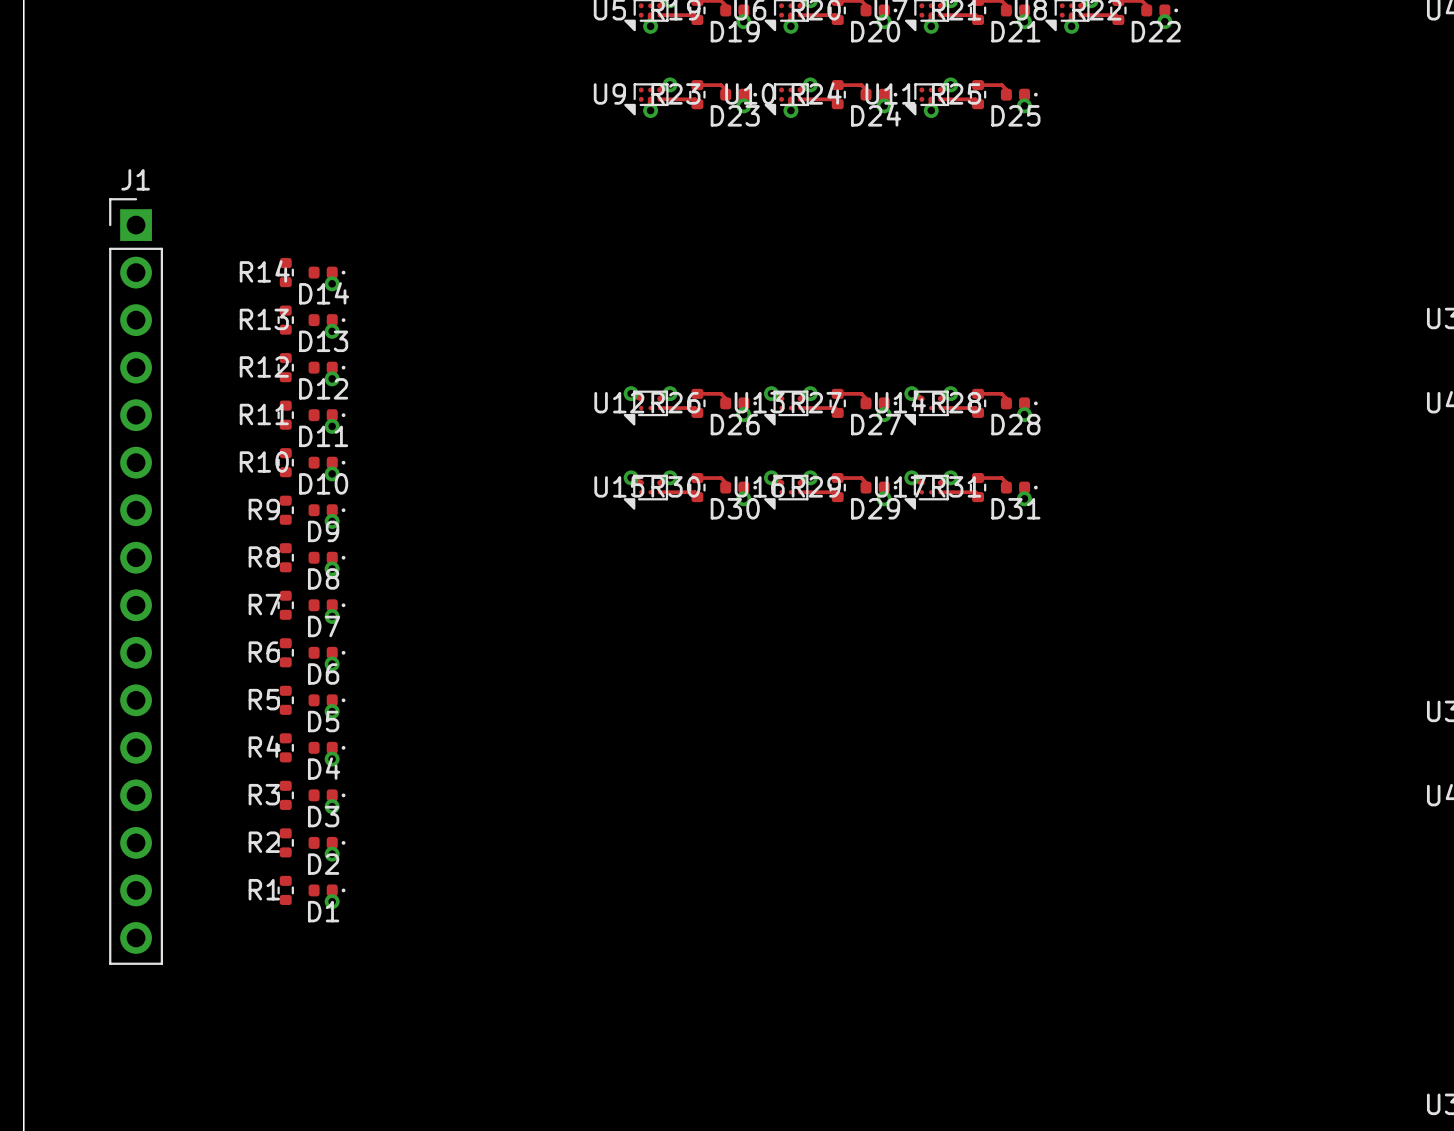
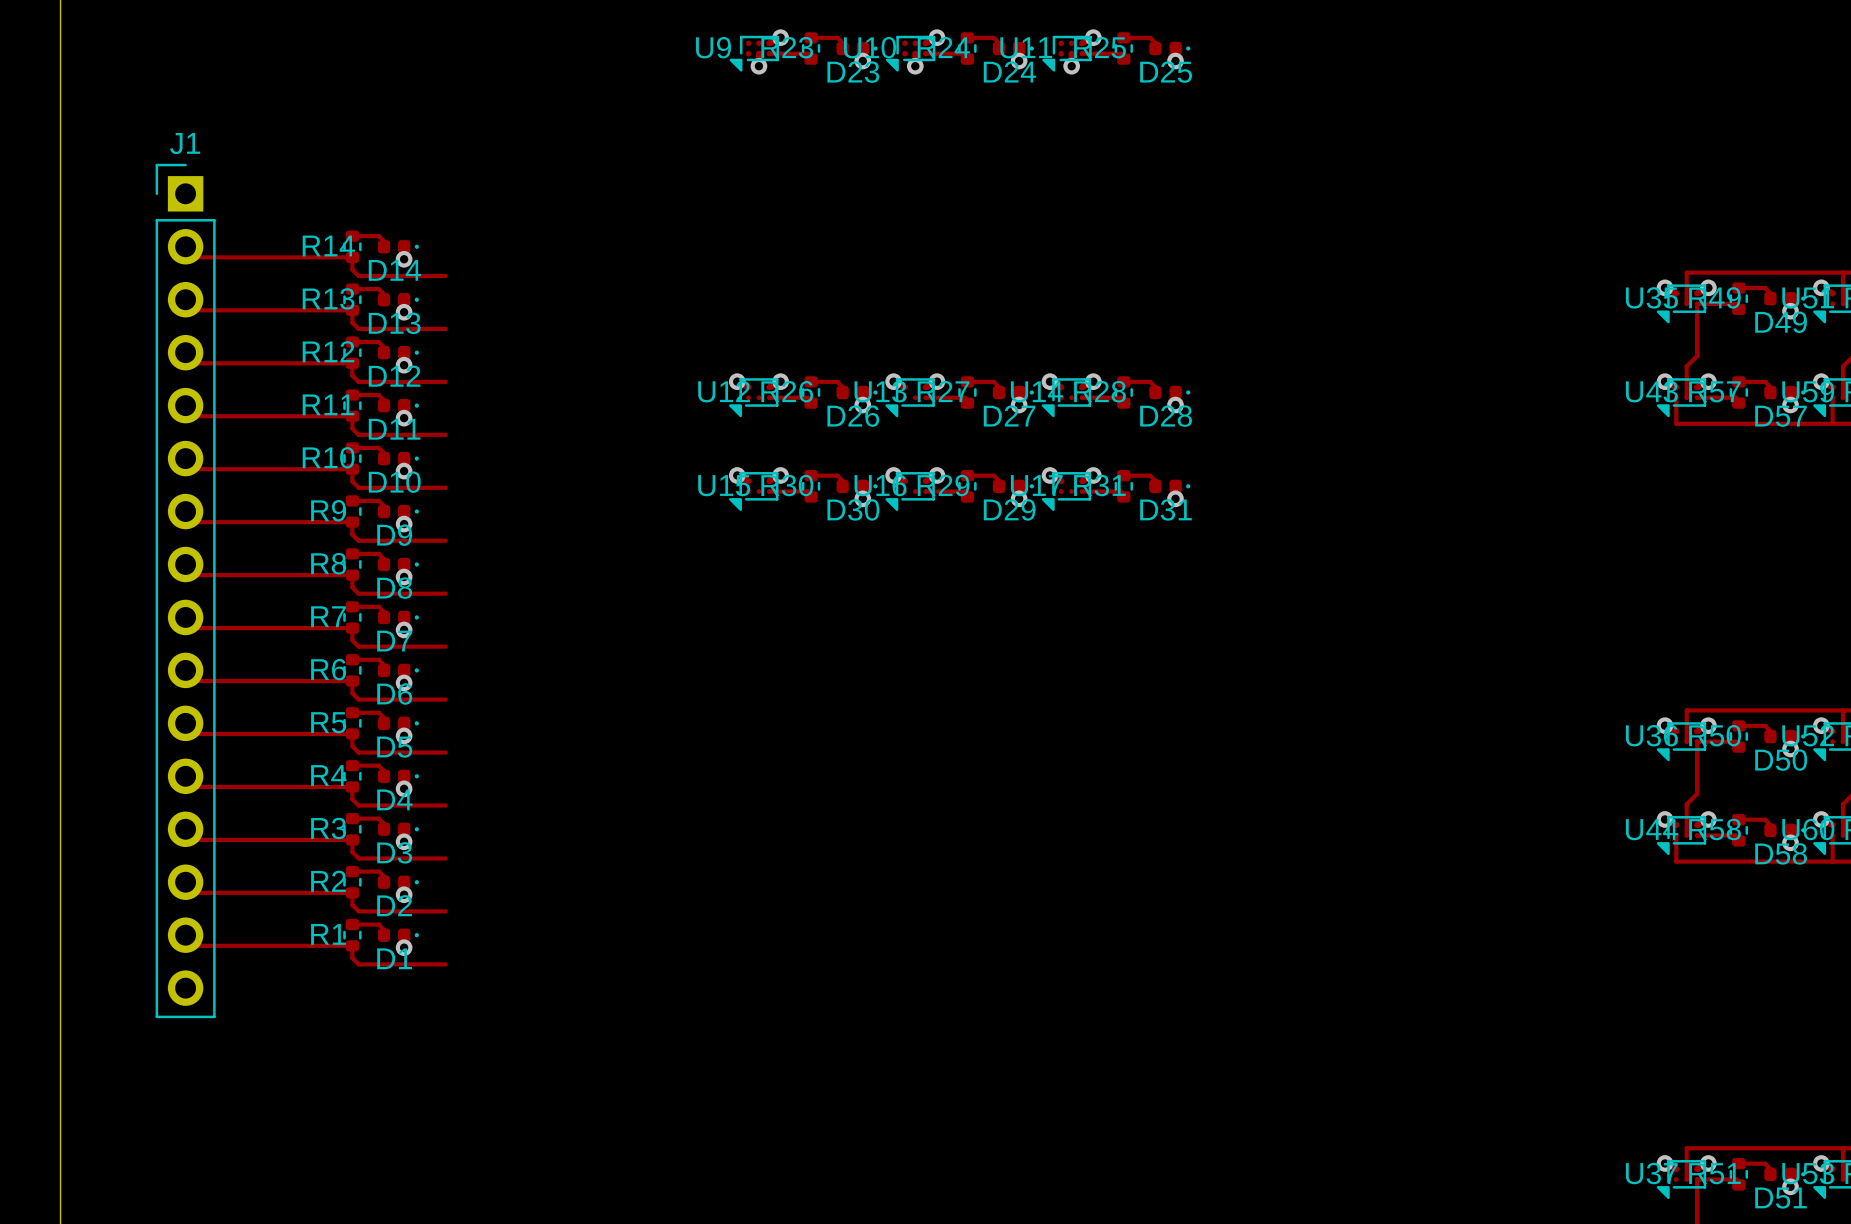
top track: none -> (352, 236) (378, 236) (384, 241) (384, 246)
top track: none -> (185, 246) (185, 252) (191, 257) (352, 257) (352, 269) (358, 275) (445, 275)
top track: none -> (352, 289) (378, 289) (384, 294) (384, 299)
top track: none -> (185, 299) (185, 304) (191, 310) (352, 310) (352, 322) (358, 328) (445, 328)
top track: none -> (352, 342) (378, 342) (384, 347) (384, 352)
top track: none -> (185, 352) (185, 357) (190, 363) (352, 363) (352, 375) (358, 381) (445, 381)
top track: none -> (352, 395) (378, 395) (384, 400) (384, 405)
top track: none -> (185, 405) (185, 411) (190, 416) (352, 416) (352, 428) (358, 434) (445, 434)
top track: none -> (352, 447) (378, 447) (384, 453) (384, 458)
top track: none -> (185, 458) (185, 463) (190, 469) (352, 469) (352, 481) (358, 487) (445, 487)
top track: none -> (352, 500) (378, 500) (384, 506) (384, 511)
top track: none -> (185, 511) (185, 516) (190, 522) (352, 522) (352, 534) (358, 540) (445, 540)
top track: none -> (352, 553) (378, 553) (384, 559) (384, 564)
top track: none -> (185, 564) (185, 569) (190, 575) (352, 575) (352, 587) (358, 593) (445, 593)
top track: none -> (352, 606) (378, 606) (384, 612) (384, 617)
top track: none -> (185, 617) (185, 622) (190, 628) (352, 628) (352, 640) (358, 646) (445, 646)
top track: none -> (352, 659) (378, 659) (384, 665) (384, 670)
top track: none -> (185, 670) (185, 675) (191, 681) (352, 681) (352, 693) (358, 699) (445, 699)
top track: none -> (352, 712) (378, 712) (384, 717) (384, 723)
top track: none -> (185, 723) (185, 728) (191, 733) (352, 733) (352, 746) (358, 752) (445, 752)
top track: none -> (352, 765) (378, 765) (384, 771) (384, 776)
top track: none -> (185, 776) (185, 781) (191, 786) (352, 786) (352, 799) (358, 805) (445, 805)
top track: none -> (352, 818) (378, 818) (384, 823) (384, 829)
top track: none -> (185, 829) (185, 834) (190, 839) (352, 839) (352, 852) (358, 858) (445, 858)
top track: none -> (352, 871) (378, 871) (384, 876) (384, 882)
top track: none -> (185, 882) (185, 887) (191, 892) (352, 892) (352, 905) (358, 911) (445, 911)
top track: none -> (352, 924) (378, 924) (384, 929) (384, 935)
top track: none -> (185, 935) (185, 940) (191, 945) (352, 945) (352, 958) (358, 964) (445, 964)

